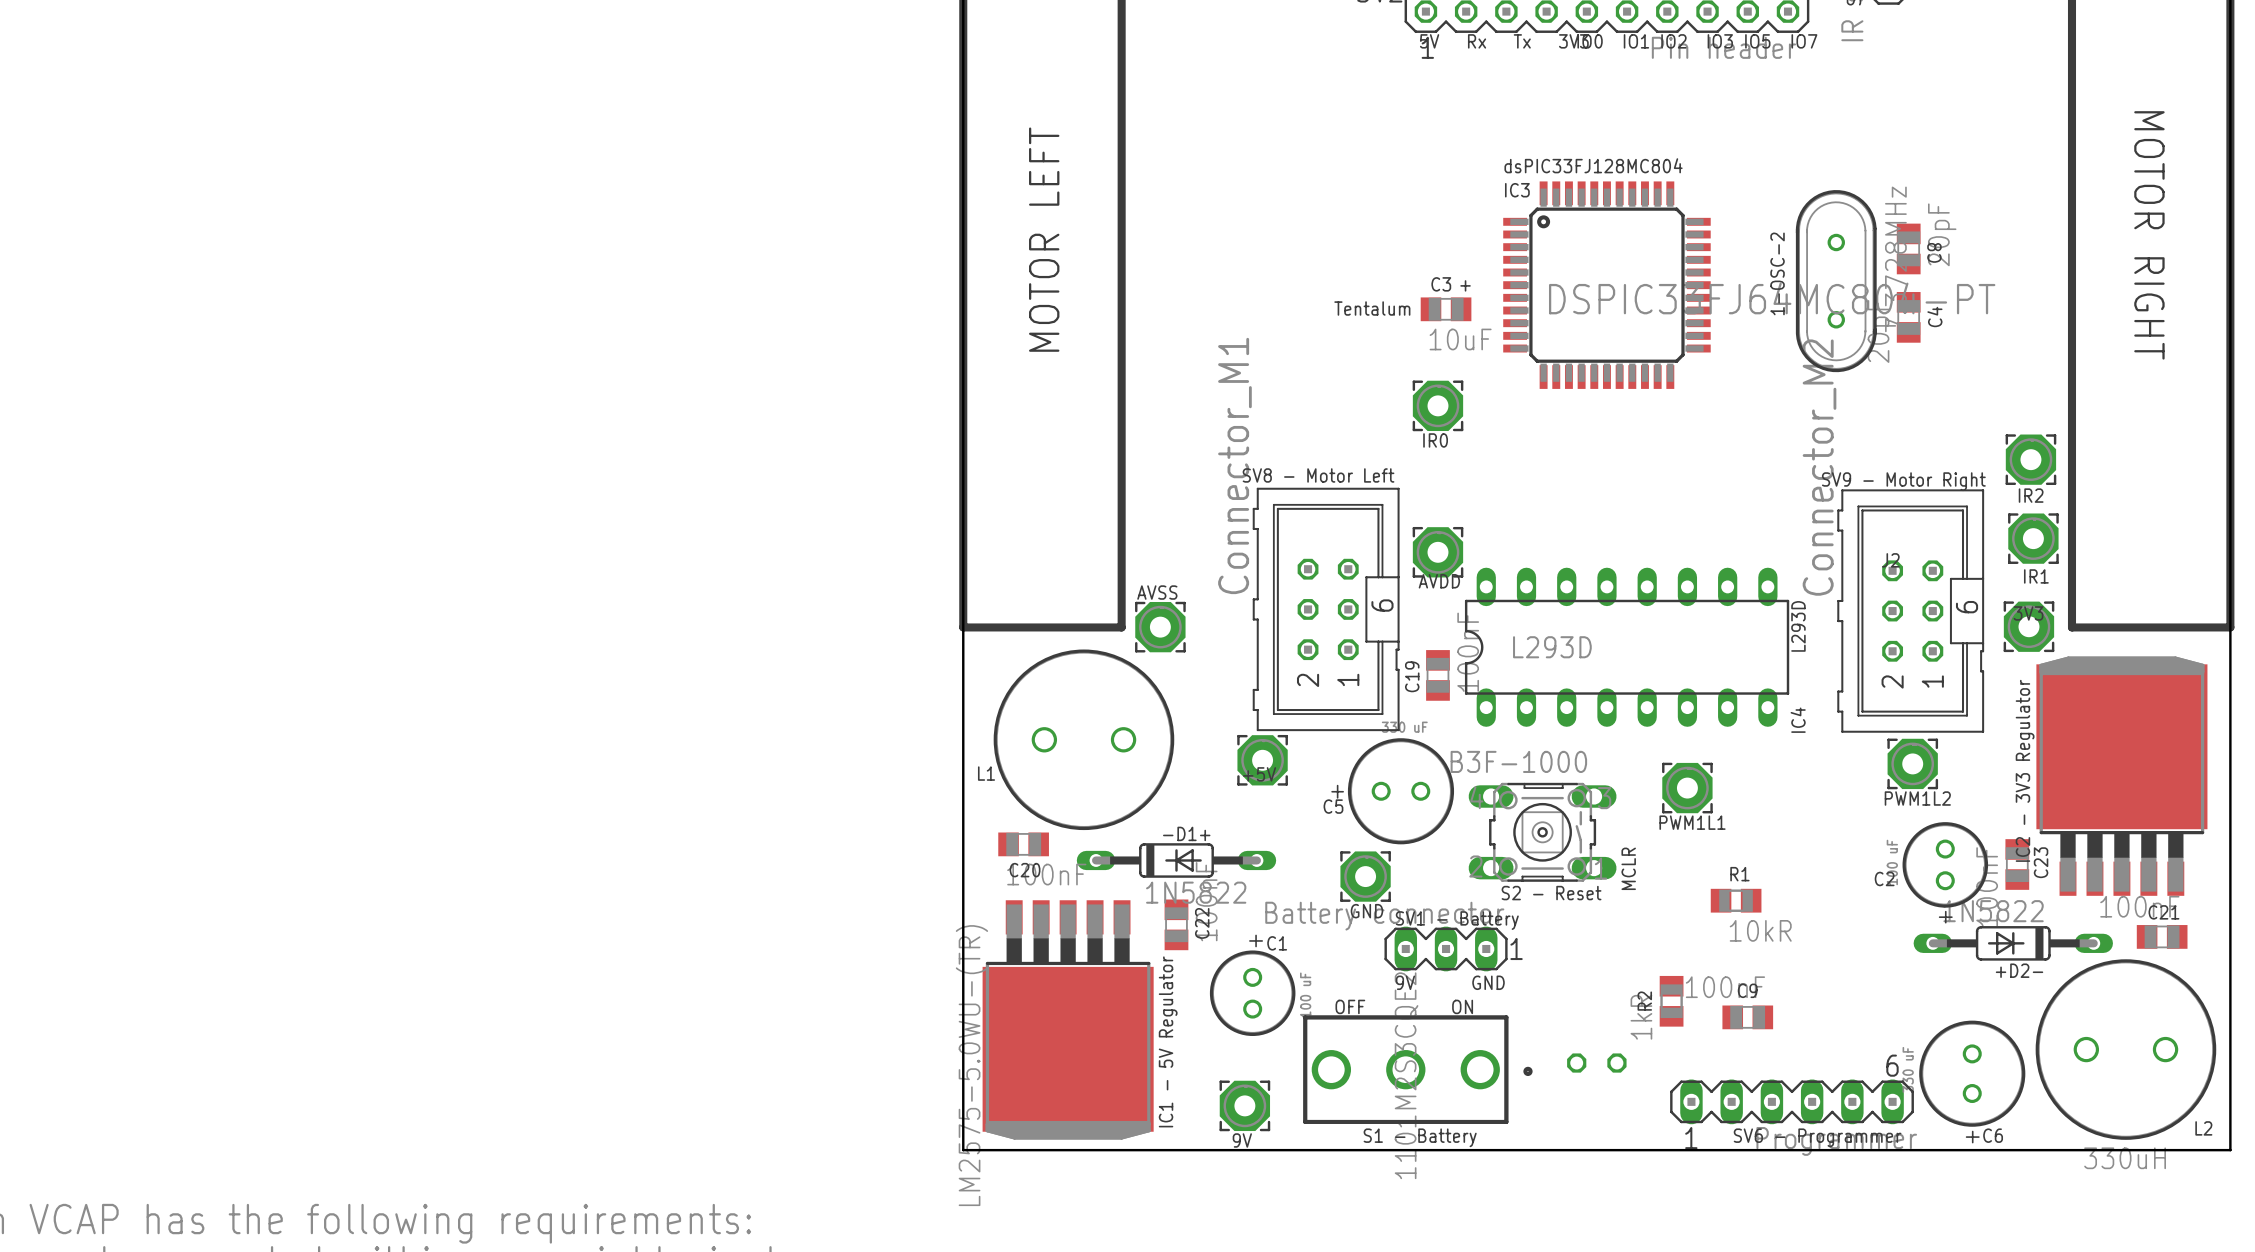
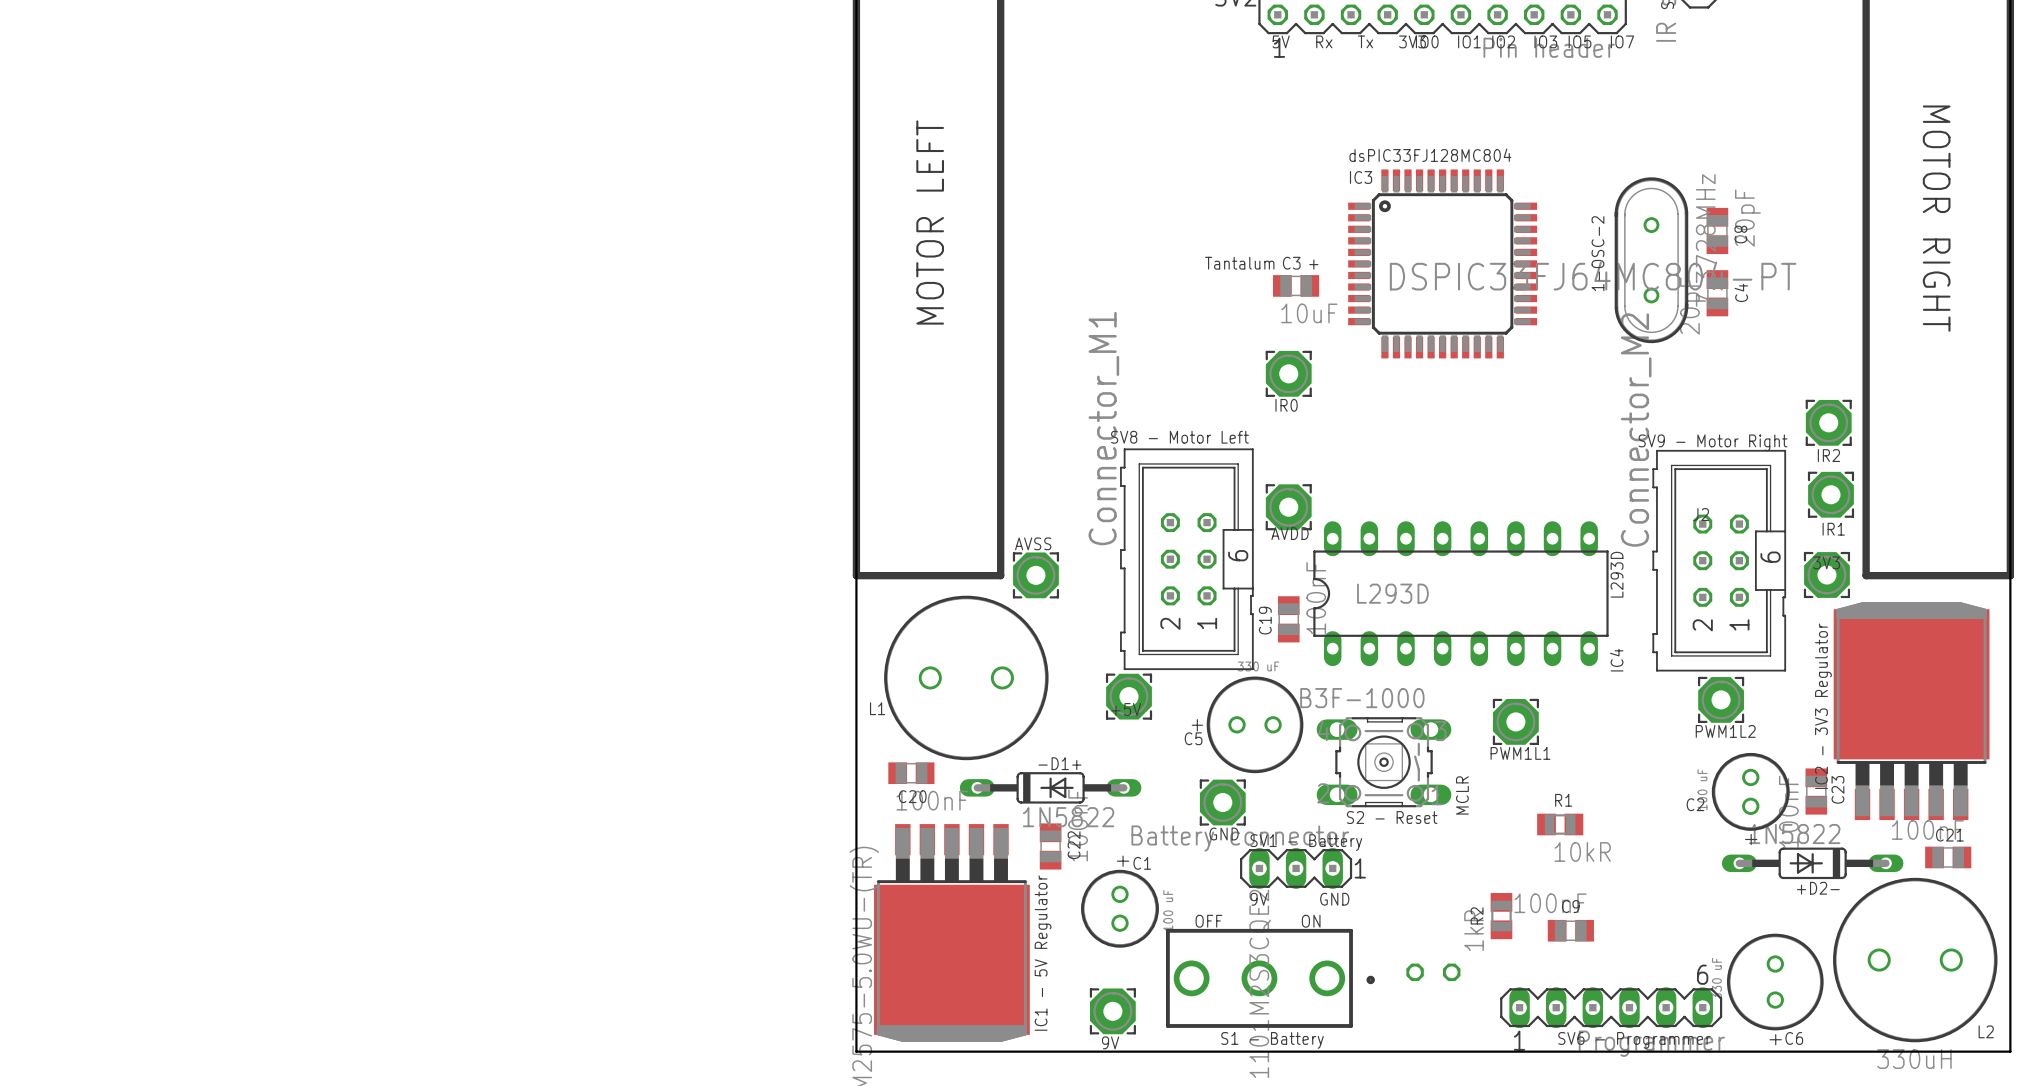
text: Tentalum (1372, 308) -> Tantalum (1239, 263)

